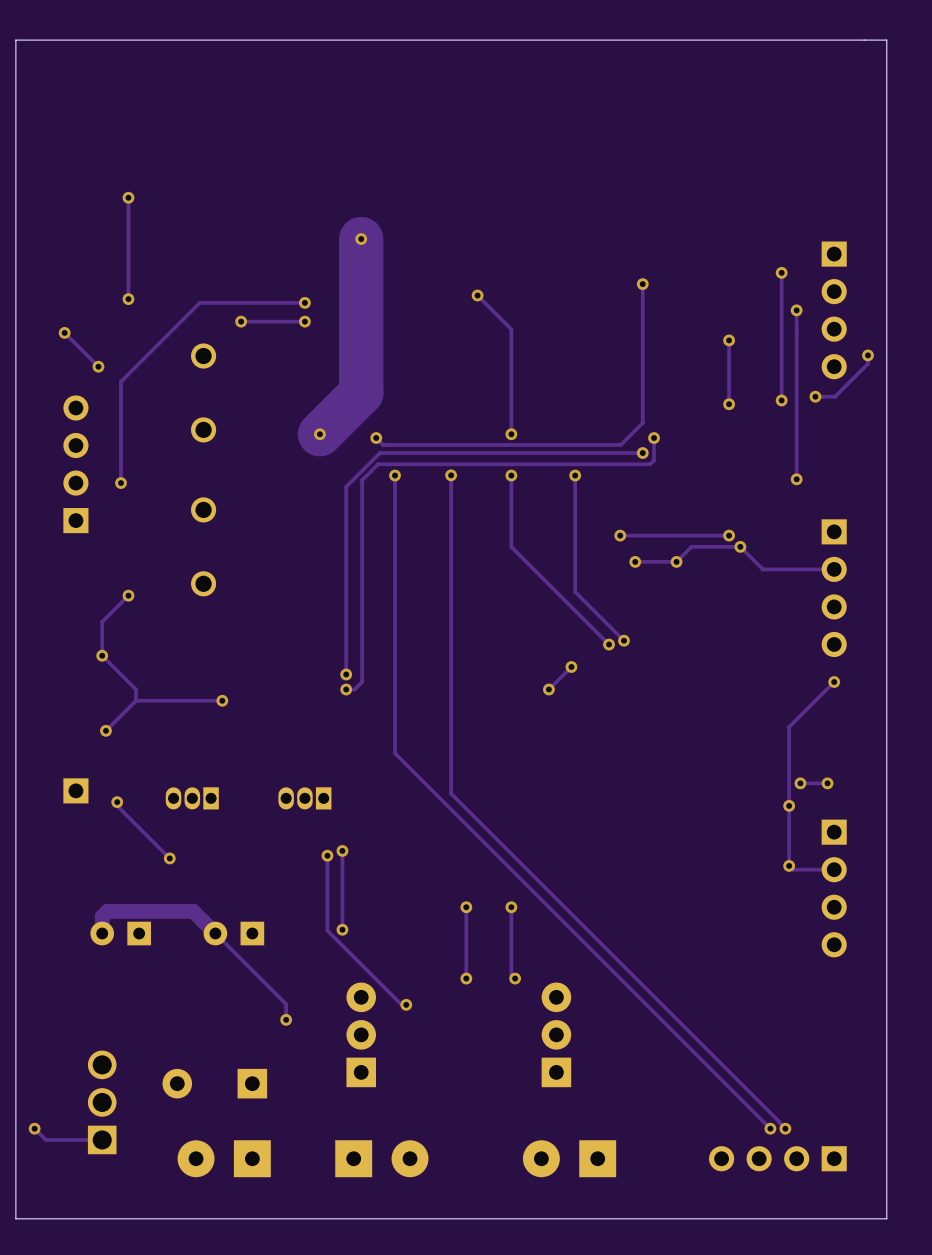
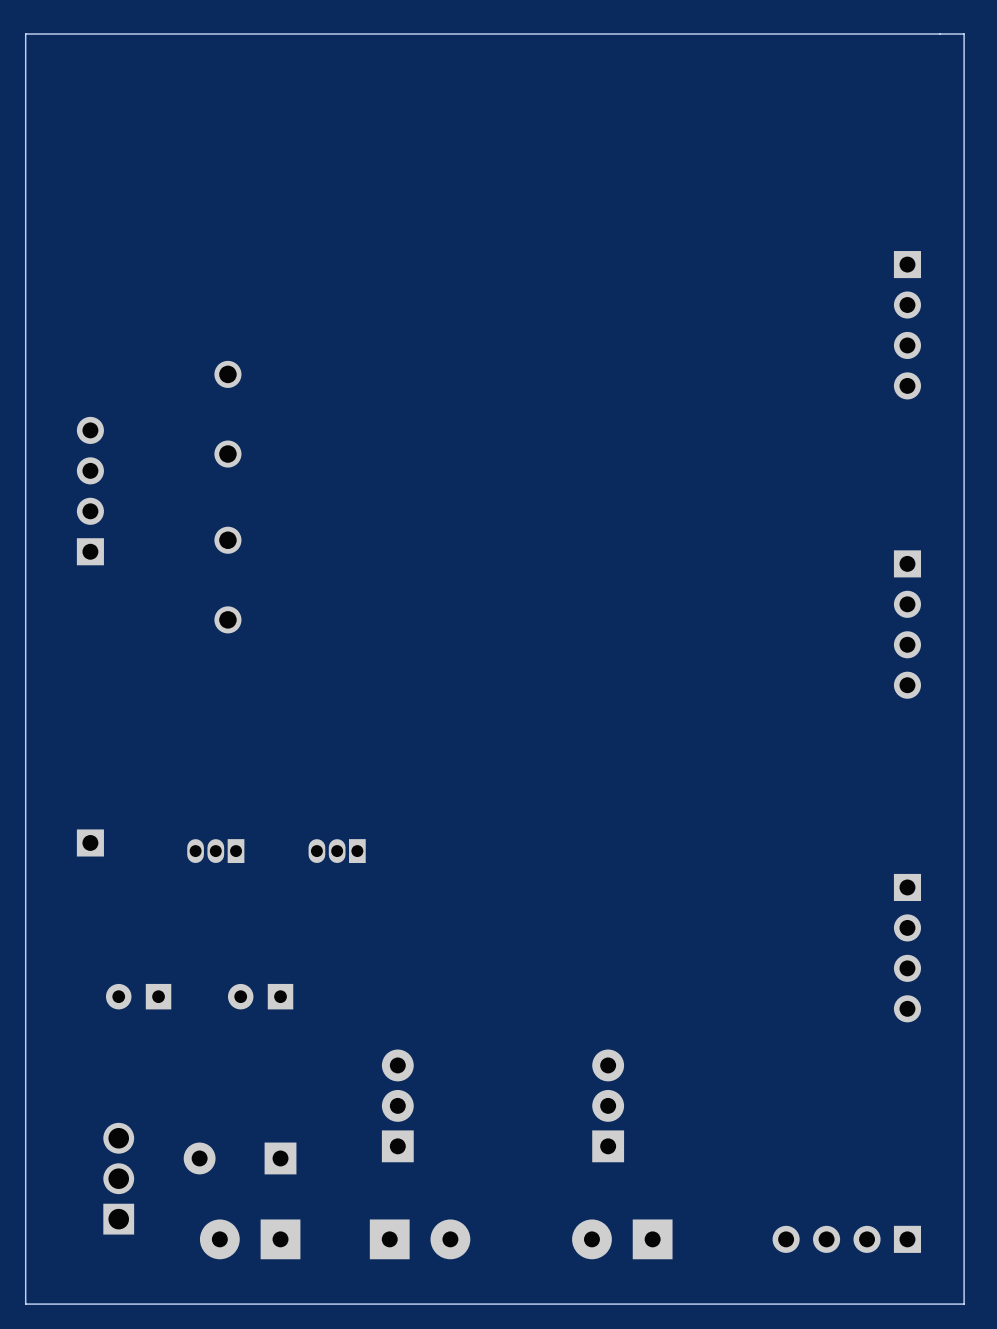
track: (128, 197) (128, 299) -> none
via: (128, 197) -> none
track: (361, 239) (361, 392) (319, 434) -> none
via: (361, 239) -> none
track: (781, 272) (781, 400) -> none
via: (781, 272) -> none
track: (642, 284) (642, 422) (620, 444) (383, 444) (376, 438) -> none
via: (642, 284) -> none
track: (477, 295) (511, 329) (511, 434) -> none
via: (477, 295) -> none
via: (128, 299) -> none
track: (304, 302) (199, 302) (120, 381) (120, 483) -> none
via: (304, 302) -> none
track: (796, 310) (796, 479) -> none
via: (796, 310) -> none
via: (241, 321) -> none
track: (304, 321) (241, 321) -> none
via: (304, 321) -> none
track: (64, 332) (98, 366) -> none
via: (64, 332) -> none
track: (729, 340) (729, 404) -> none
via: (729, 340) -> none
track: (867, 355) (867, 363) (835, 396) (815, 396) -> none
via: (867, 355) -> none
via: (98, 366) -> none
via: (815, 396) -> none
via: (781, 400) -> none
via: (729, 404) -> none
via: (319, 434) -> none
via: (511, 434) -> none
via: (376, 438) -> none
track: (654, 438) (654, 460) (650, 464) (378, 464) (362, 480) (362, 681) (354, 689) (346, 689) -> none
via: (654, 438) -> none
track: (642, 453) (379, 453) (346, 486) (346, 674) -> none
via: (642, 453) -> none
track: (395, 475) (395, 753) (770, 1128) -> none
via: (395, 475) -> none
track: (451, 475) (451, 793) (785, 1128) -> none
via: (451, 475) -> none
track: (511, 475) (511, 546) (609, 644) -> none
via: (511, 475) -> none
track: (575, 475) (575, 591) (623, 640) -> none
via: (575, 475) -> none
via: (796, 479) -> none
via: (120, 483) -> none
via: (620, 535) -> none
track: (729, 535) (620, 535) -> none
via: (729, 535) -> none
via: (740, 546) -> none
track: (635, 561) (676, 561) (691, 546) (740, 546) (762, 569) (834, 569) -> none
via: (635, 561) -> none
via: (676, 561) -> none
track: (128, 595) (102, 621) (102, 655) (135, 689) (135, 700) -> none
via: (128, 595) -> none
via: (623, 640) -> none
via: (609, 644) -> none
via: (102, 655) -> none
track: (571, 666) (548, 689) -> none
via: (571, 666) -> none
via: (346, 674) -> none
track: (834, 682) (789, 727) (789, 865) (792, 869) (834, 869) -> none
via: (834, 682) -> none
via: (346, 689) -> none
via: (548, 689) -> none
track: (135, 700) (105, 730) -> none
track: (222, 700) (135, 700) -> none
via: (222, 700) -> none
via: (105, 730) -> none
via: (800, 783) -> none
track: (827, 783) (800, 783) -> none
via: (827, 783) -> none
track: (117, 802) (117, 805) (169, 858) -> none
via: (117, 802) -> none
via: (789, 805) -> none
track: (342, 850) (342, 929) -> none
via: (342, 850) -> none
track: (327, 855) (327, 930) (401, 1004) (406, 1004) -> none
via: (327, 855) -> none
via: (169, 858) -> none
via: (789, 865) -> none
track: (466, 907) (466, 978) -> none
via: (466, 907) -> none
track: (511, 907) (511, 974) (515, 978) -> none
via: (511, 907) -> none
via: (342, 929) -> none
track: (102, 933) (102, 916) (107, 911) (193, 911) (286, 1004) (286, 1019) -> none
via: (466, 978) -> none
via: (515, 978) -> none
via: (406, 1004) -> none
via: (286, 1019) -> none
track: (34, 1128) (45, 1139) (102, 1139) -> none
via: (34, 1128) -> none
via: (770, 1128) -> none
via: (785, 1128) -> none

